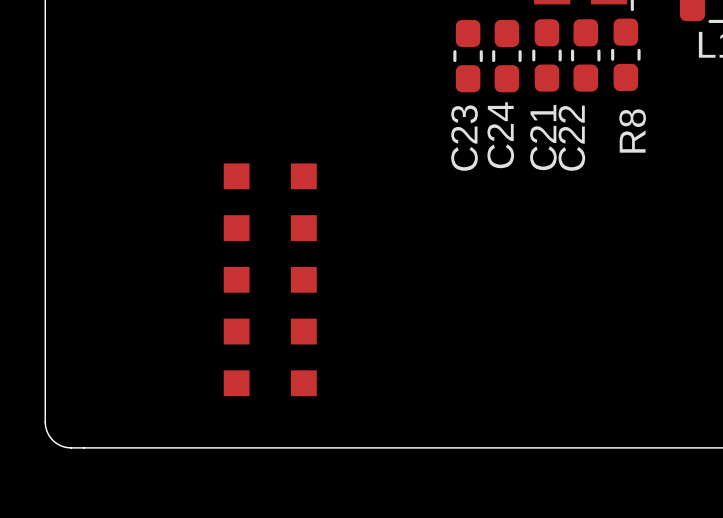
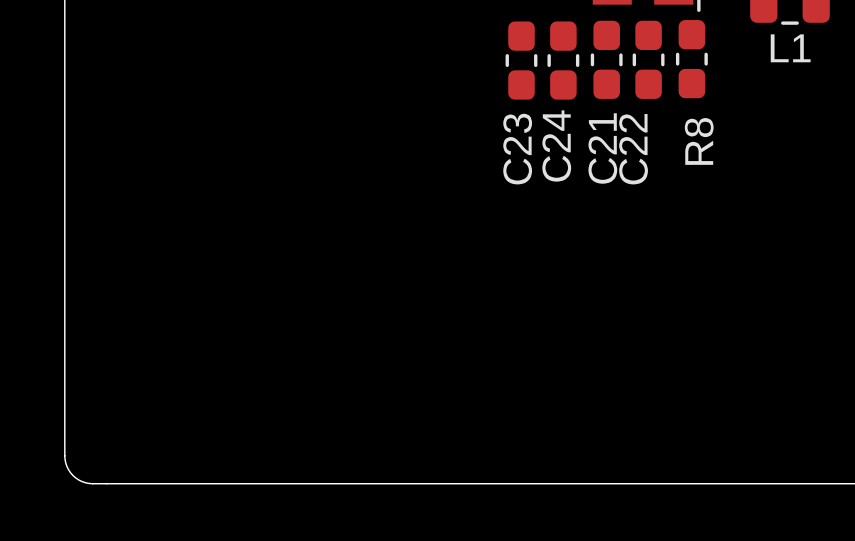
part: (270, 279) -> none

